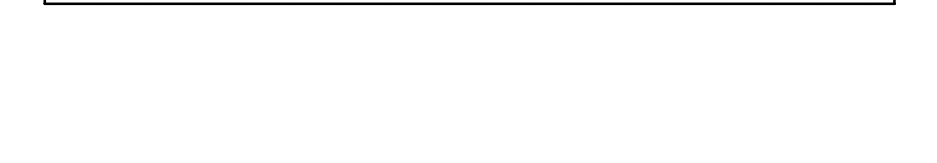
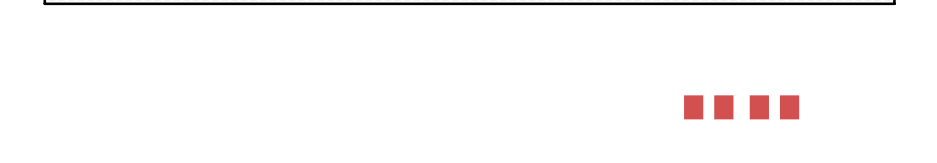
part: none -> (708, 107)
part: none -> (774, 107)

